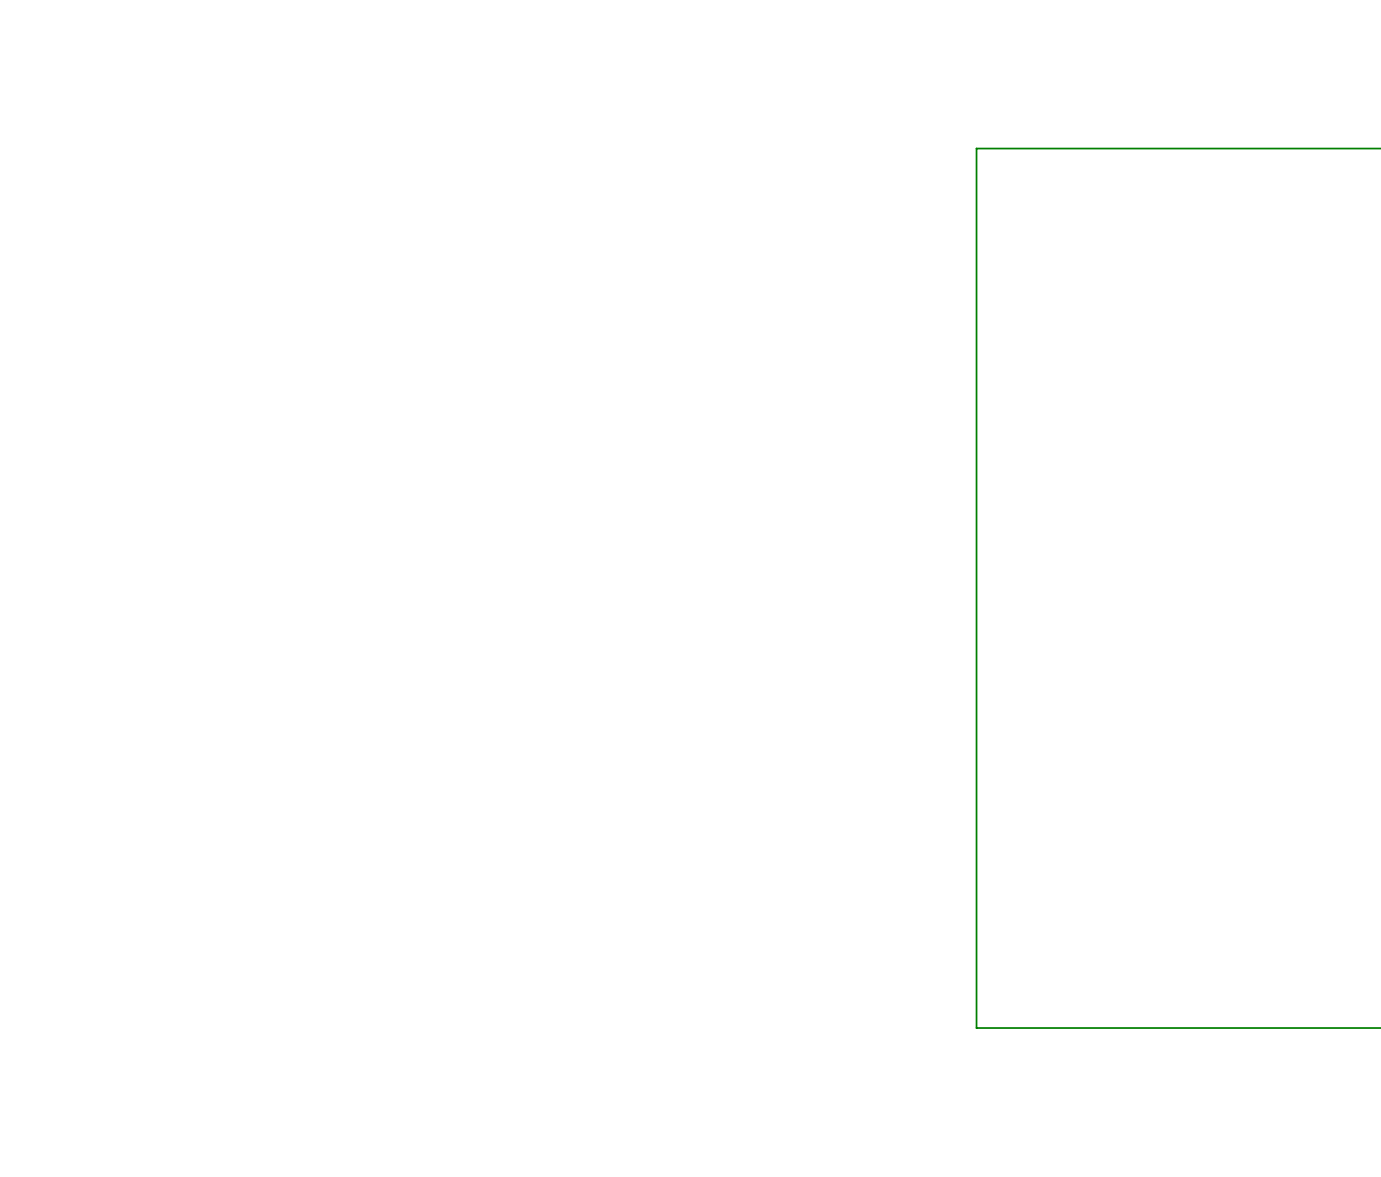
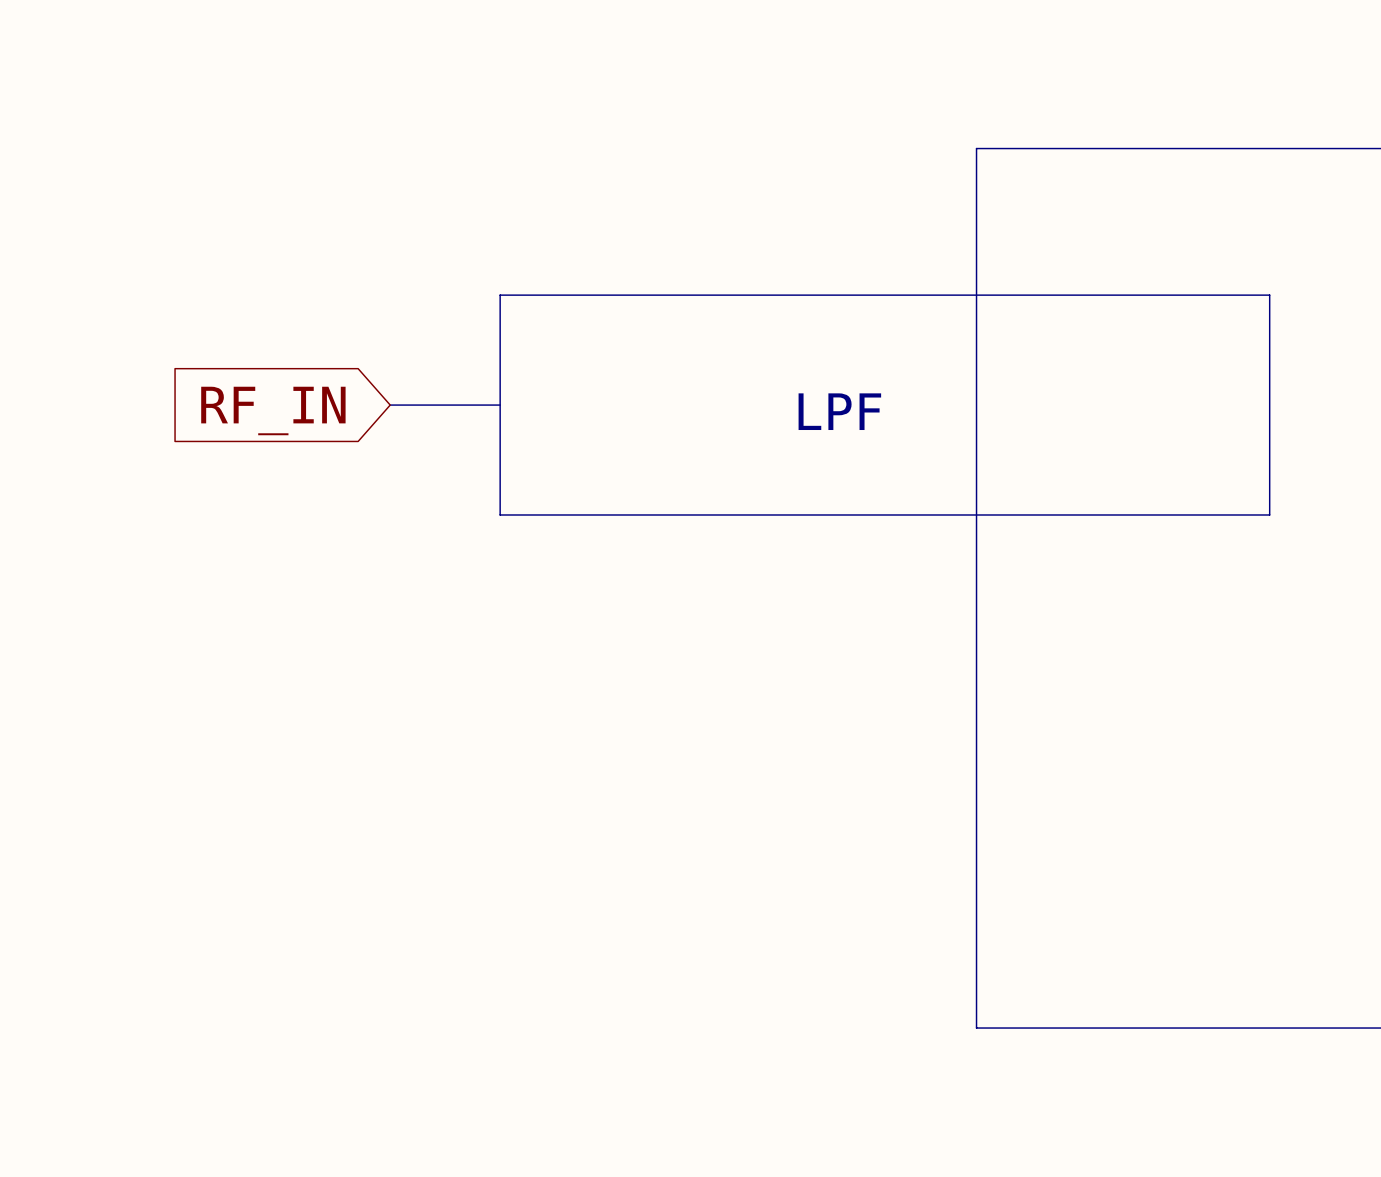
line: none -> (500, 295) (1269, 295) (1269, 514) (500, 514) (500, 295)
wire: none -> (390, 405) (500, 405)
global label: none -> RF_IN (273, 410)
text: none -> LPF (839, 411)

